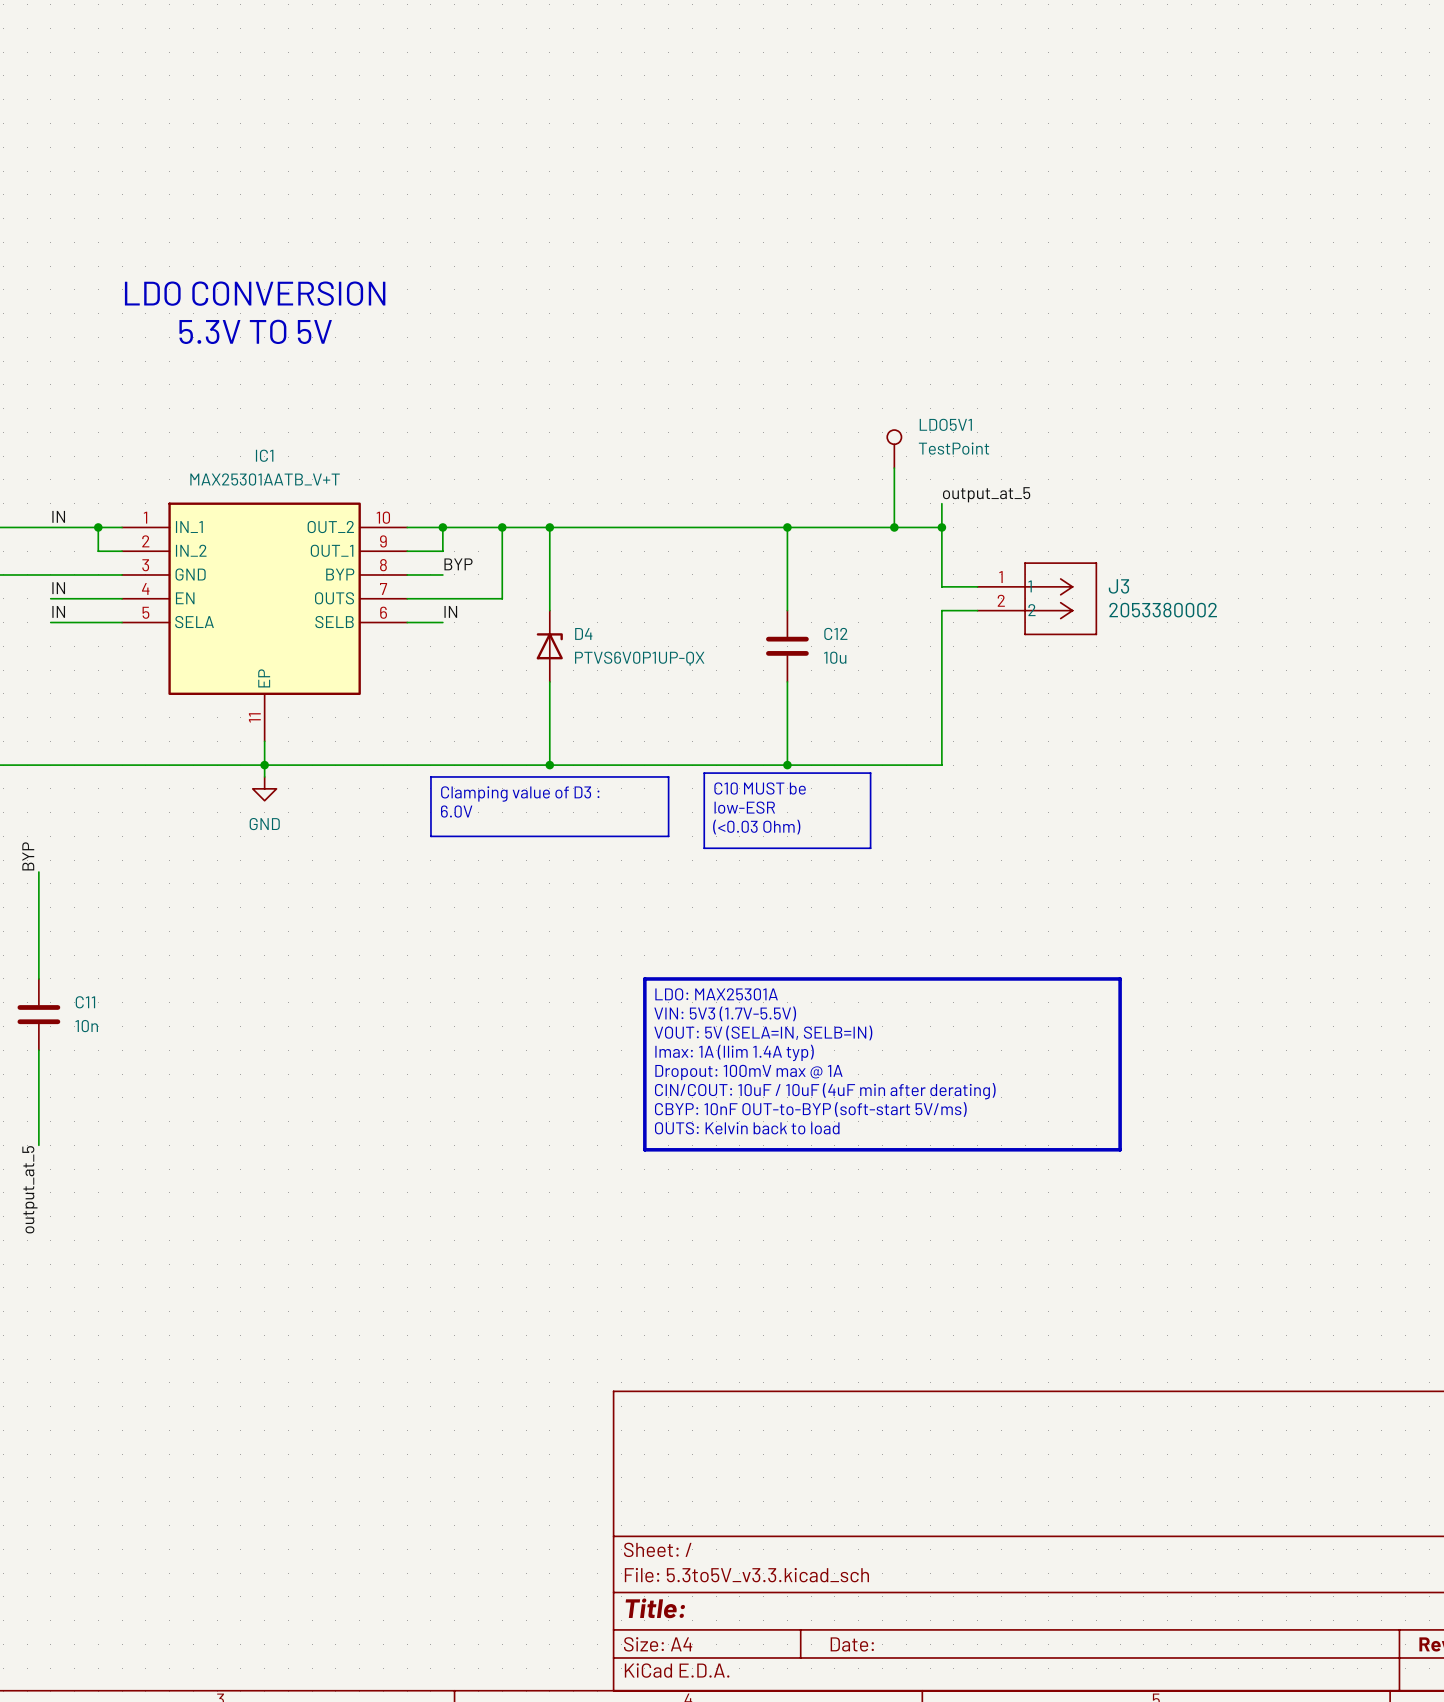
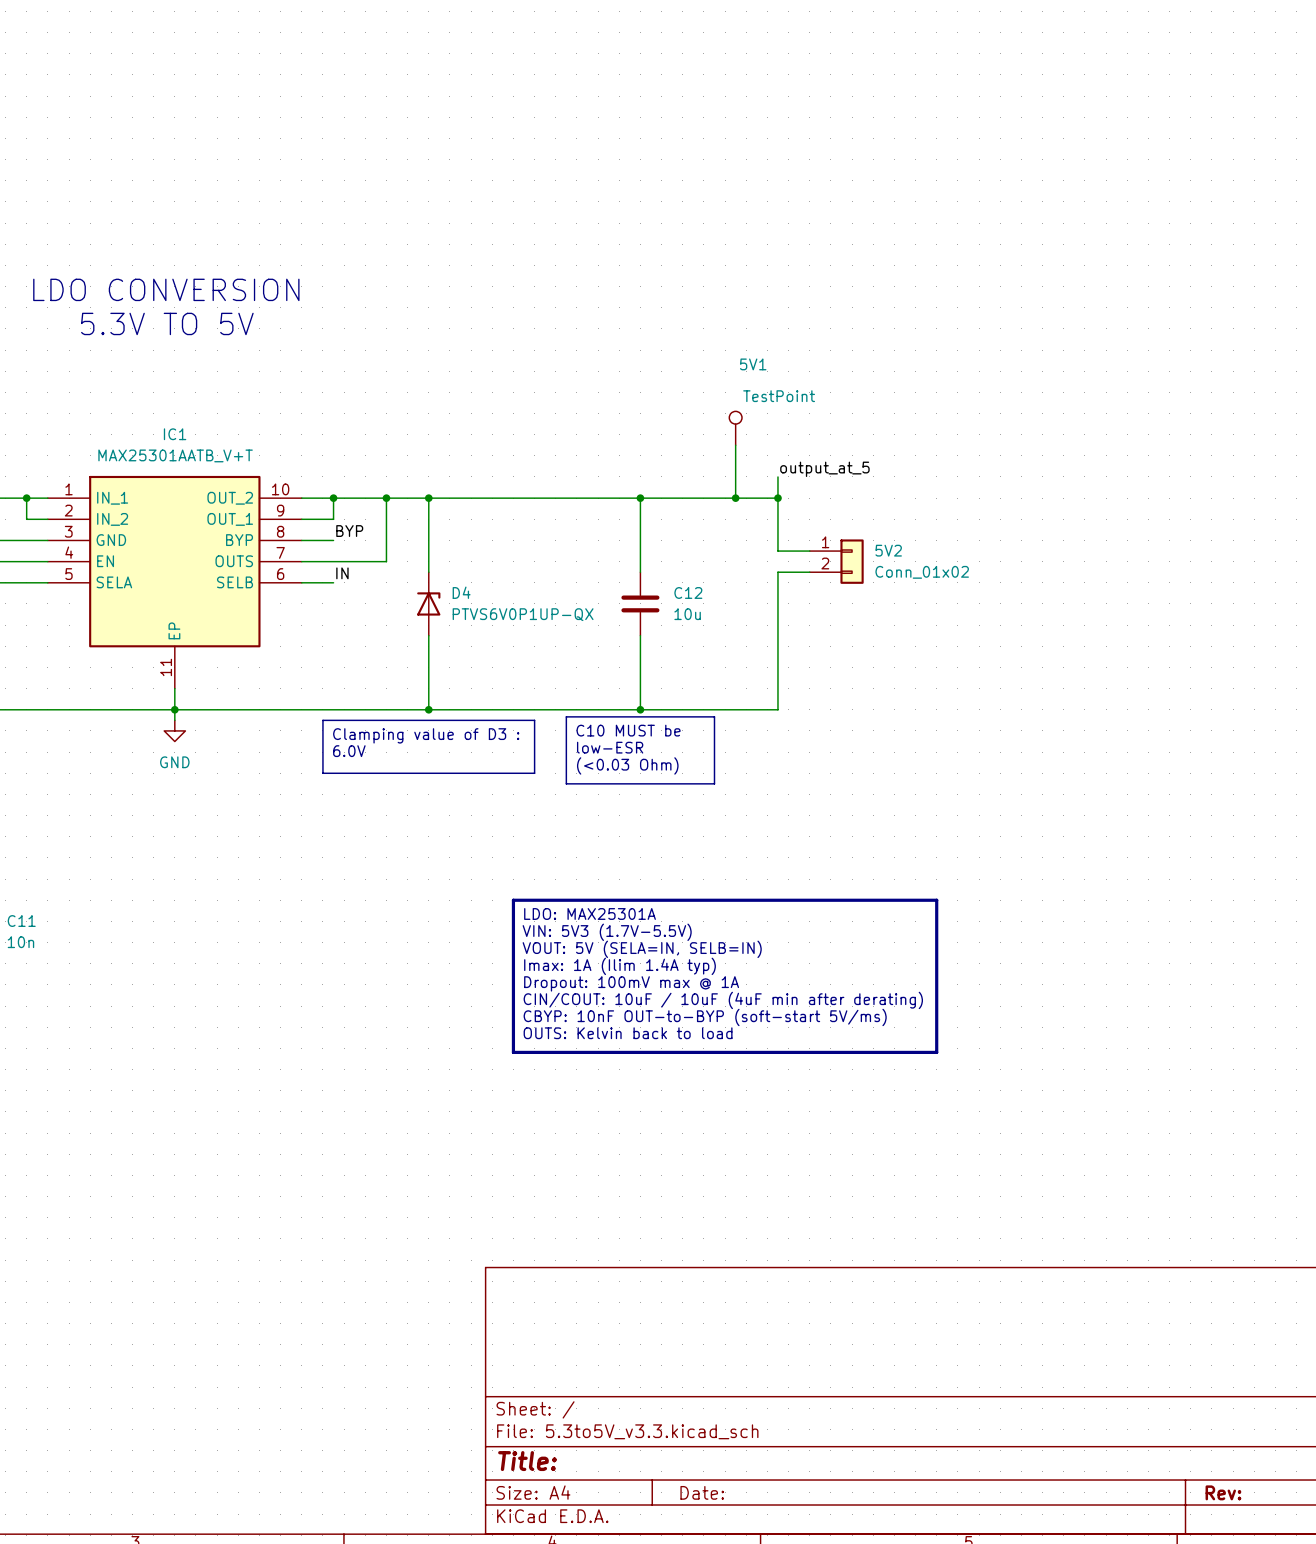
LDO5V1 name: LDO5V1 (945, 424) -> 5V1 (753, 364)
LDO5V1 value position: TestPoint (954, 448) -> TestPoint (779, 396)
5V2: none -> Conn_01x02 (836, 561)
J3: 2053380002 (1037, 598) -> none

